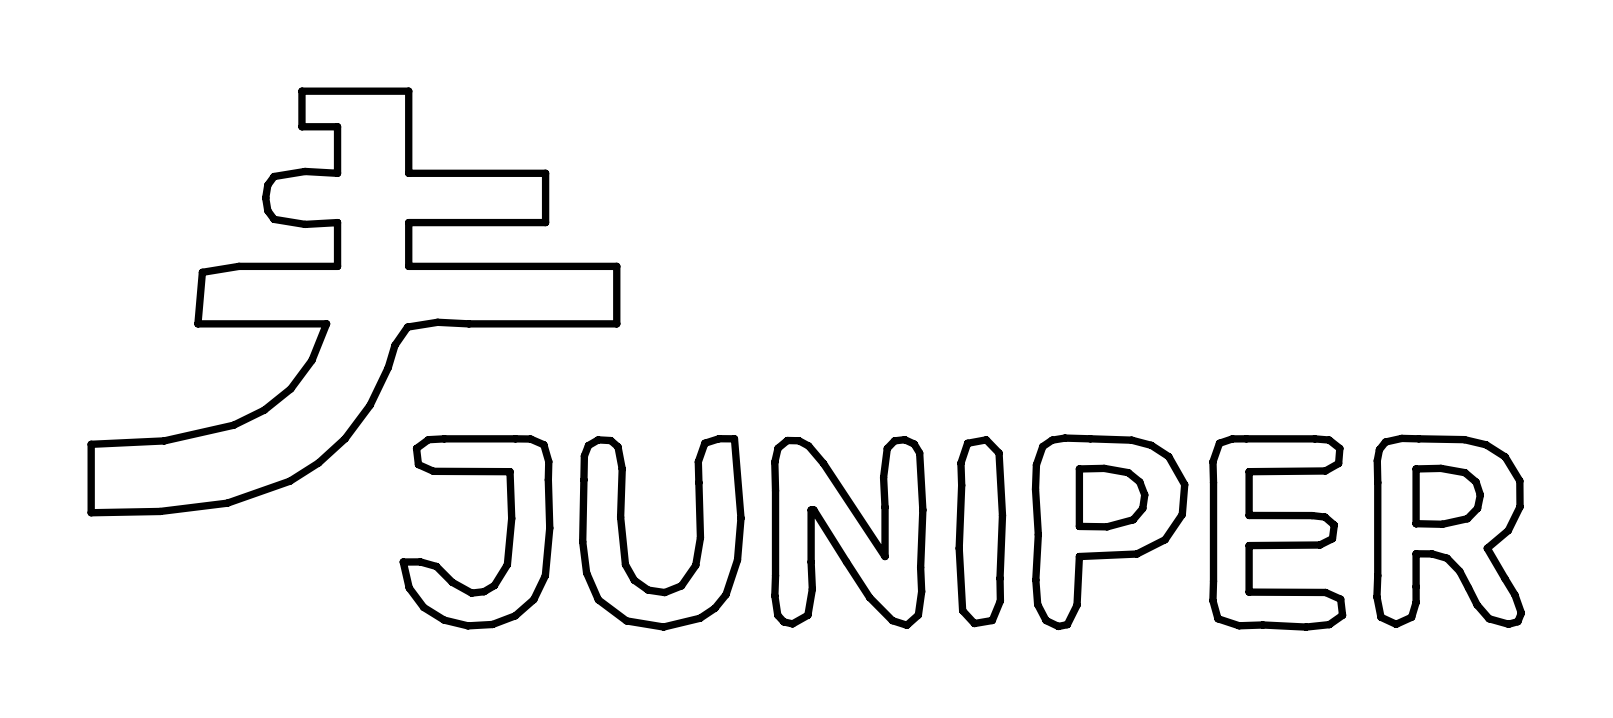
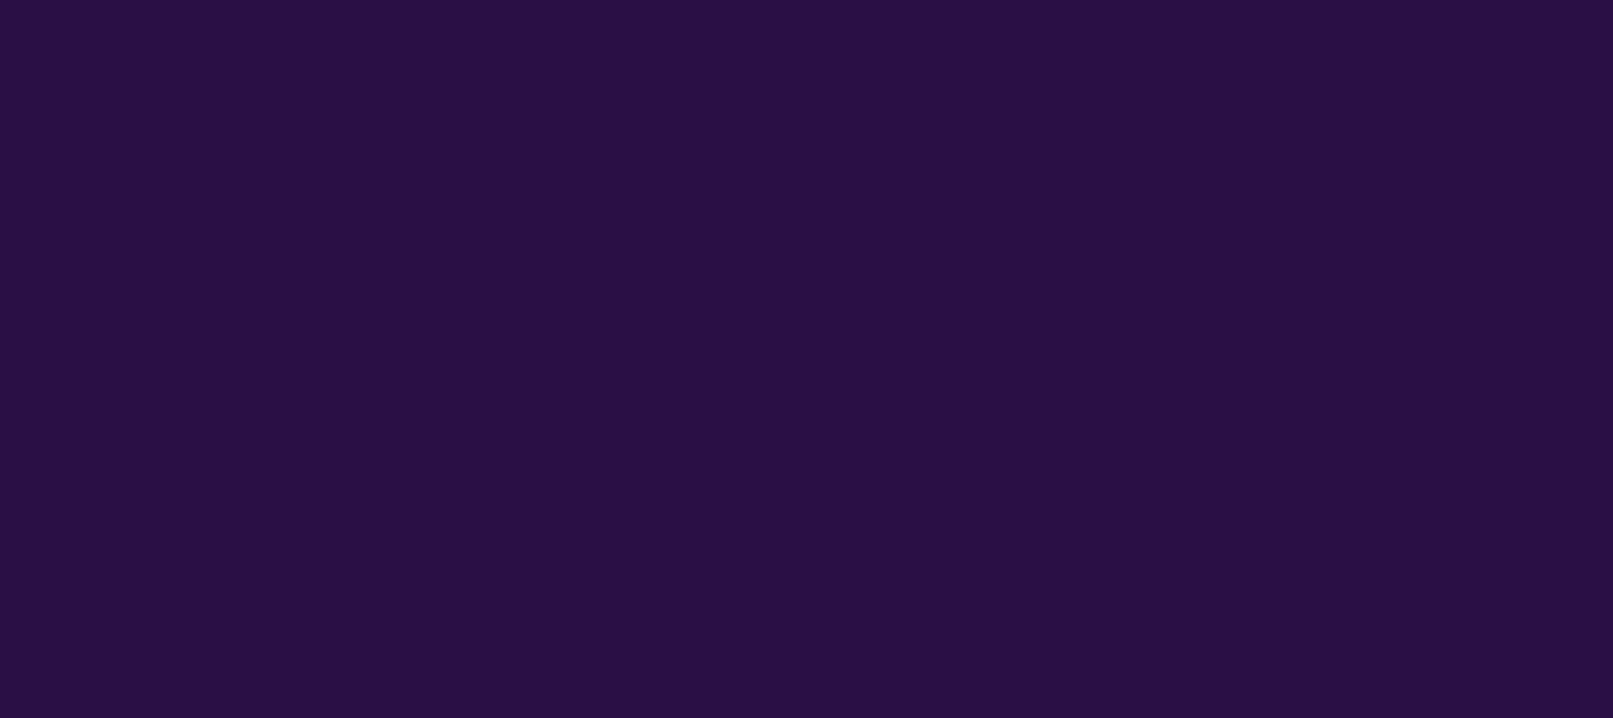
line: (301, 91) (301, 126) (337, 126) (337, 173) (305, 171) (274, 176) (267, 185) (265, 197) (267, 210) (274, 219) (305, 224) (337, 222) (337, 266) (239, 266) (202, 272) (197, 323) (326, 323) (311, 360) (290, 388) (264, 410) (233, 425) (164, 440) (91, 444) (91, 512) (160, 511) (227, 503) (289, 481) (318, 462) (345, 438) (370, 405) (388, 367) (394, 345) (407, 327) (437, 322) (616, 323) (616, 266) (408, 266) (408, 222) (545, 222) (545, 173) (408, 173) (408, 91) (301, 91) -> none
line: (444, 438) (428, 439) (416, 448) (418, 464) (433, 471) (510, 471) (511, 518) (507, 564) (494, 585) (484, 591) (471, 593) (452, 582) (436, 566) (420, 561) (403, 562) (409, 587) (423, 607) (444, 620) (467, 625) (492, 624) (515, 615) (533, 599) (545, 575) (549, 528) (548, 461) (543, 444) (530, 439) (444, 438) -> none
line: (719, 438) (704, 443) (698, 461) (700, 537) (695, 565) (681, 585) (664, 592) (648, 590) (634, 580) (625, 564) (620, 517) (622, 468) (618, 446) (610, 440) (598, 439) (588, 445) (584, 456) (582, 541) (586, 572) (598, 599) (626, 620) (663, 627) (700, 618) (714, 608) (726, 594) (737, 559) (740, 518) (734, 438) (719, 438) -> none
line: (1065, 438) (1052, 440) (1042, 446) (1036, 464) (1035, 489) (1038, 534) (1035, 580) (1037, 604) (1046, 620) (1058, 626) (1067, 624) (1077, 605) (1079, 556) (1136, 554) (1165, 539) (1182, 514) (1184, 484) (1168, 456) (1151, 445) (1131, 440) (1065, 438) -> none
line: (1232, 438) (1219, 443) (1212, 461) (1212, 600) (1217, 618) (1239, 625) (1306, 627) (1329, 624) (1342, 615) (1340, 599) (1325, 592) (1249, 592) (1249, 545) (1319, 545) (1332, 538) (1334, 525) (1324, 517) (1312, 515) (1249, 515) (1249, 471) (1325, 470) (1338, 463) (1339, 448) (1329, 440) (1232, 438) -> none
line: (1401, 438) (1385, 442) (1379, 449) (1377, 460) (1376, 596) (1380, 617) (1396, 624) (1411, 617) (1416, 602) (1416, 553) (1432, 553) (1447, 558) (1459, 571) (1477, 604) (1489, 618) (1508, 624) (1517, 621) (1521, 613) (1514, 595) (1487, 548) (1508, 530) (1520, 506) (1519, 480) (1505, 456) (1486, 444) (1464, 439) (1401, 438) -> none
line: (904, 439) (894, 440) (887, 448) (883, 477) (885, 556) (823, 463) (808, 446) (798, 440) (787, 440) (778, 448) (774, 462) (774, 595) (777, 615) (783, 621) (792, 623) (807, 615) (812, 589) (811, 510) (813, 510) (869, 597) (892, 620) (906, 625) (918, 615) (921, 591) (922, 510) (919, 453) (914, 444) (904, 439) -> none
line: (986, 439) (999, 453) (1002, 515) (1000, 600) (992, 620) (974, 623) (962, 610) (959, 548) (960, 463) (967, 443) (986, 439) -> none
line: (1104, 468) (1128, 472) (1139, 481) (1144, 494) (1142, 508) (1133, 519) (1107, 526) (1079, 526) (1079, 468) (1104, 468) -> none
line: (1440, 468) (1465, 472) (1476, 482) (1480, 494) (1477, 508) (1467, 518) (1442, 524) (1416, 523) (1416, 468) (1440, 468) -> none

